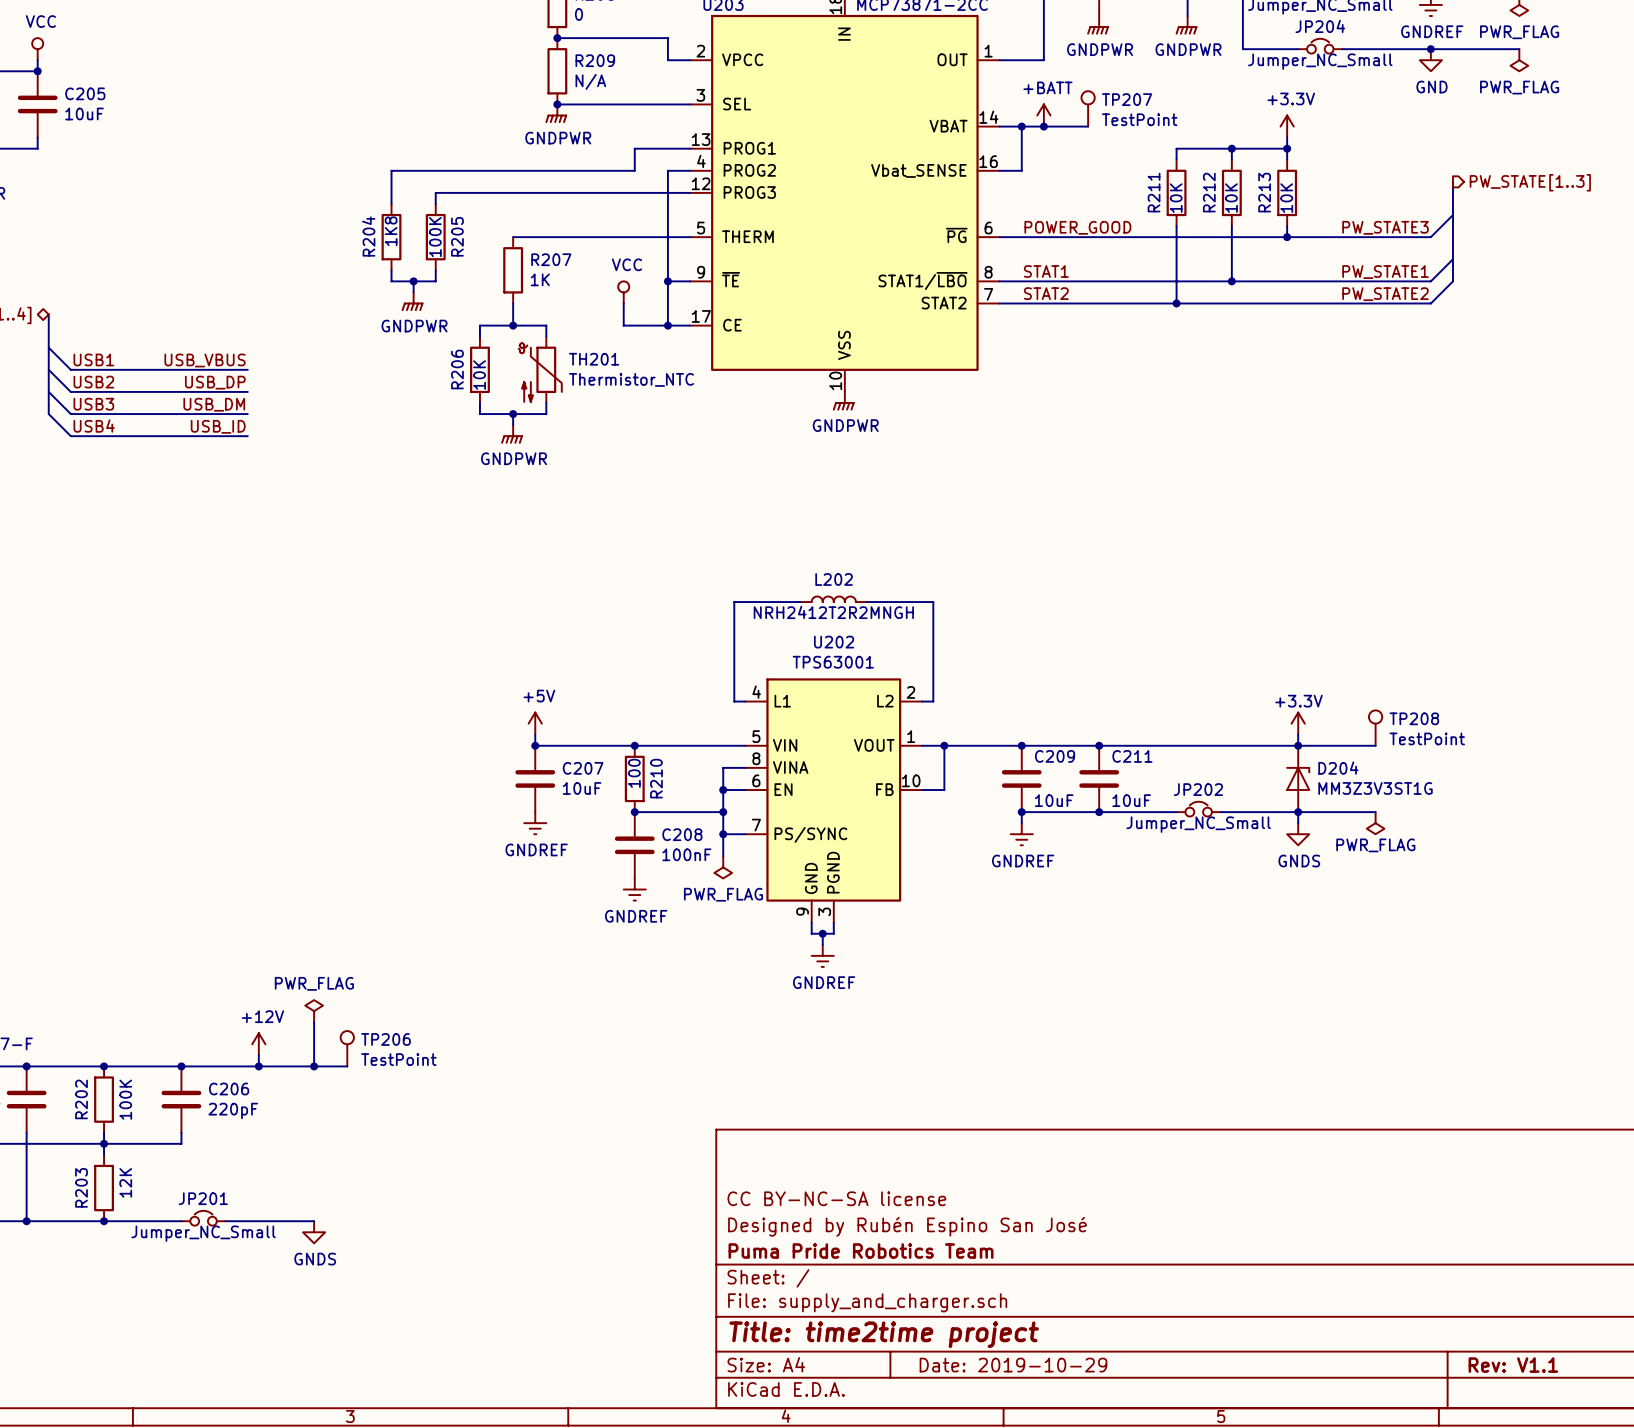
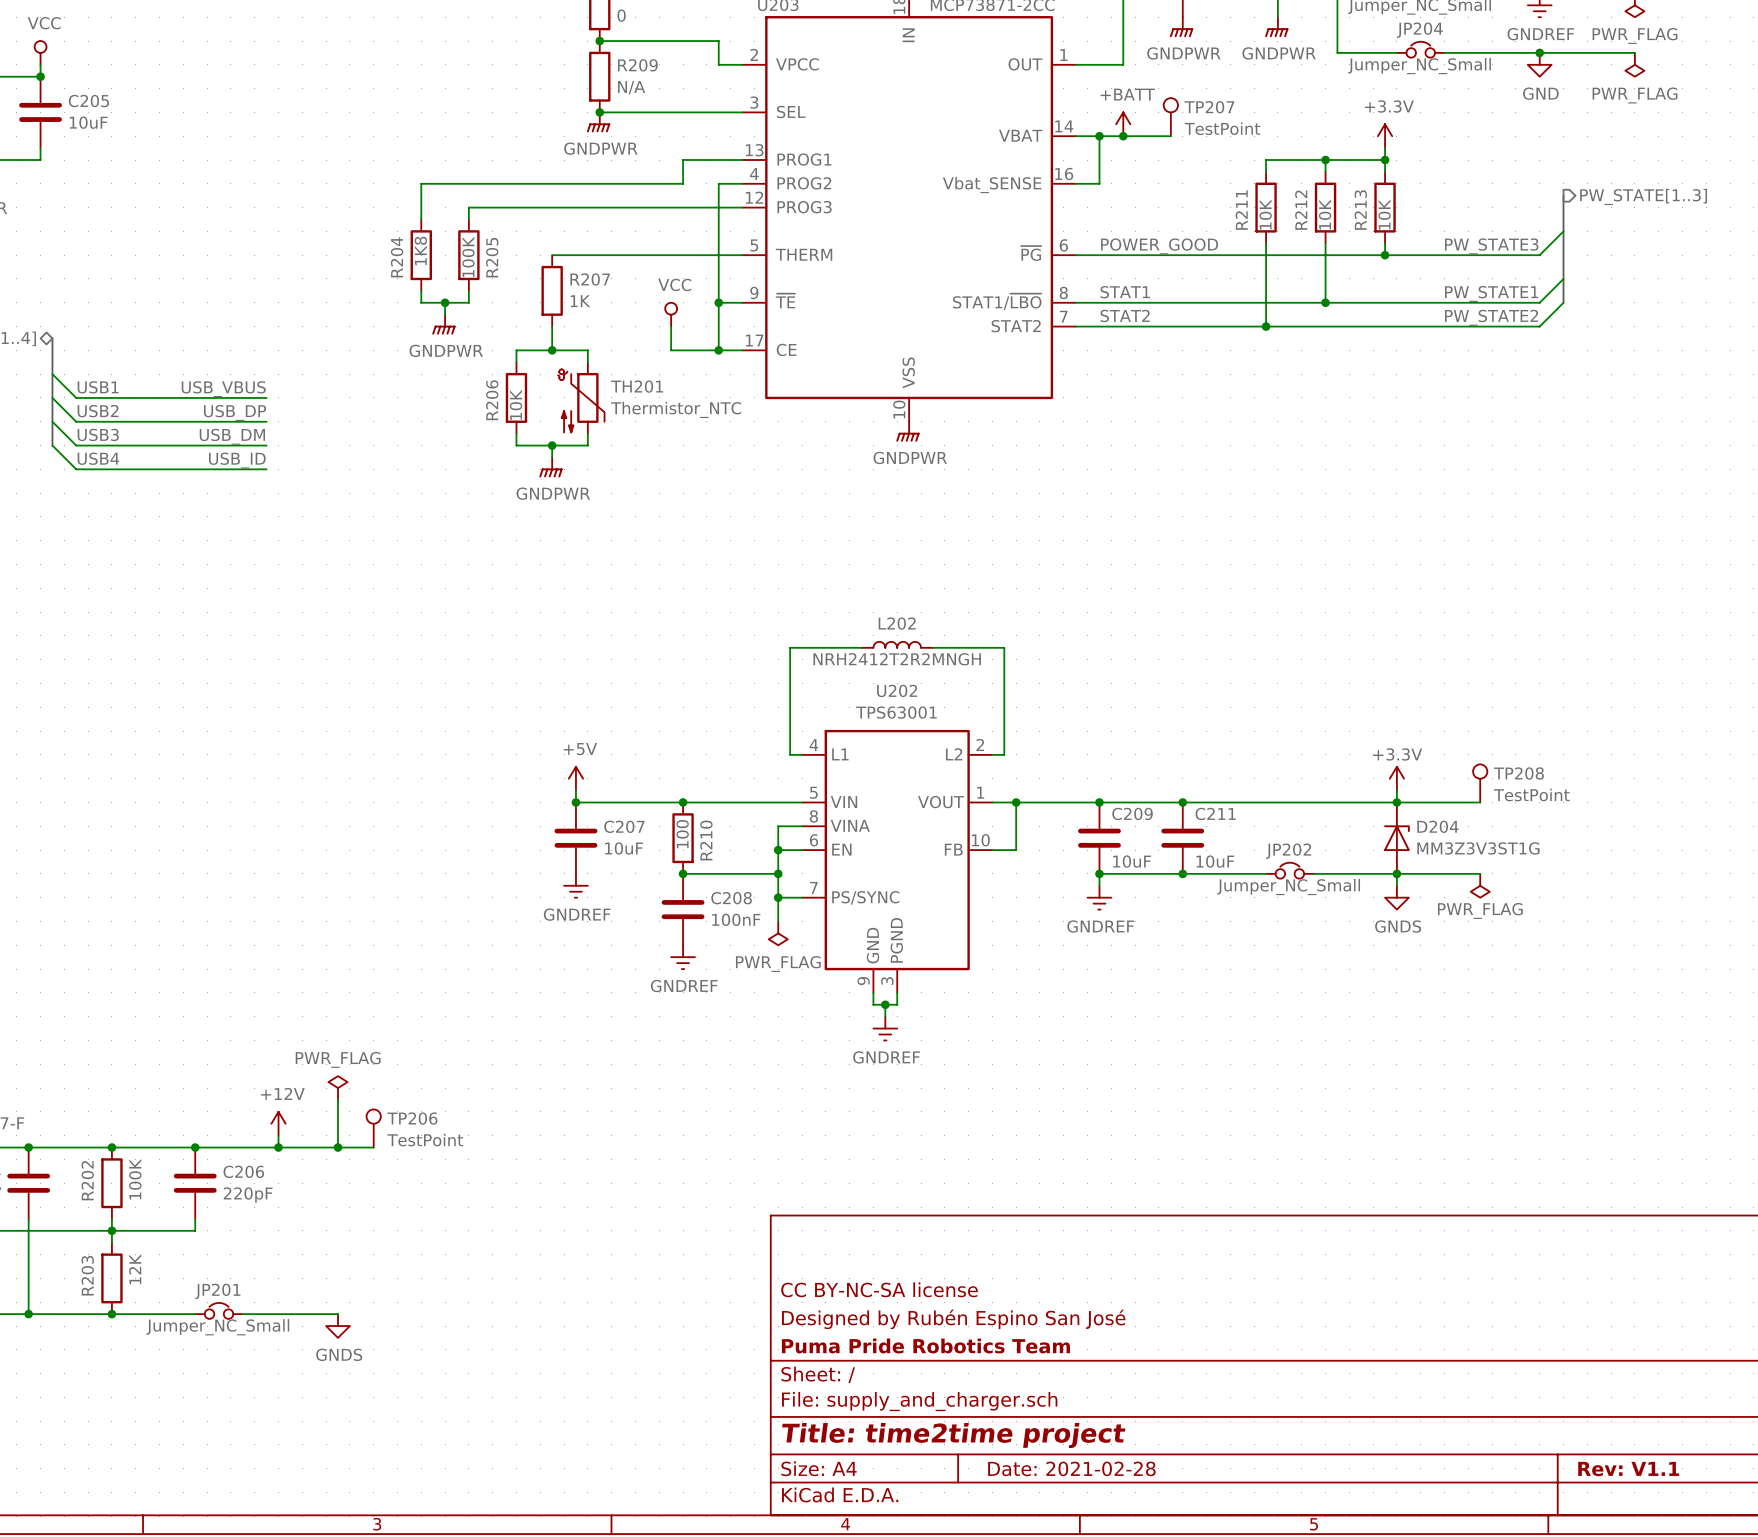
title block: Date: 2019-10-29 (1013, 1365) -> Date: 2021-02-28 (1071, 1468)

